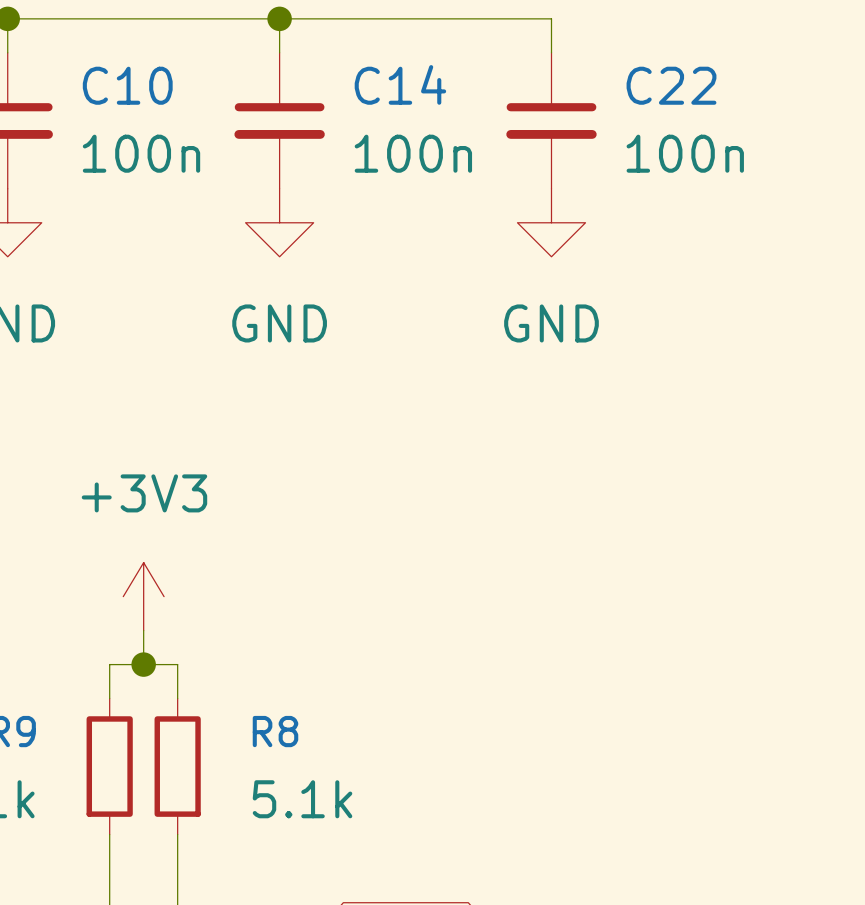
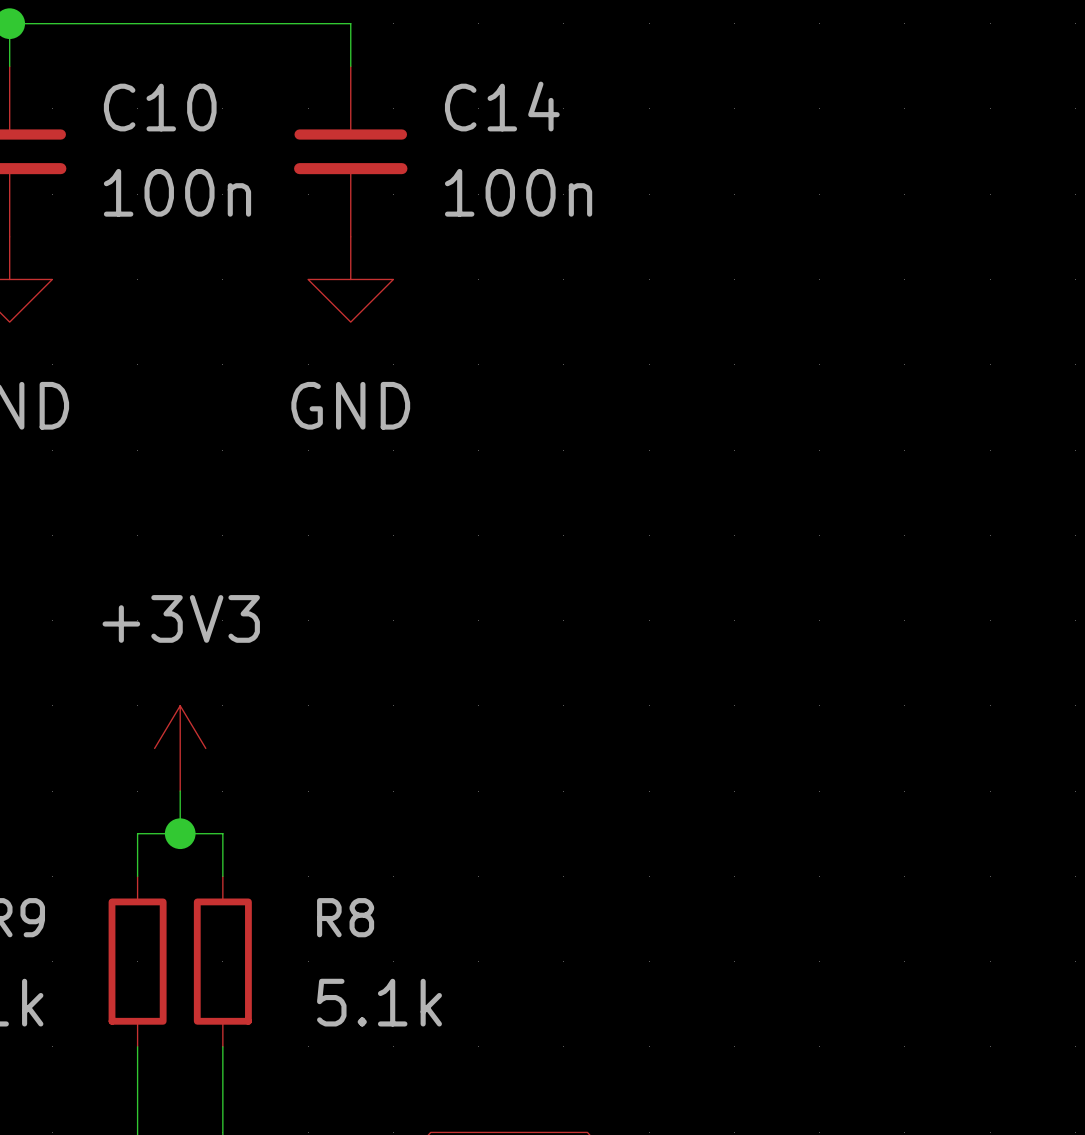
wire: (279, 18) (551, 18) (551, 52) -> none
junction: (279, 18) -> none
C22: 100n (551, 120) -> none
power symbol: GND (551, 222) -> none

